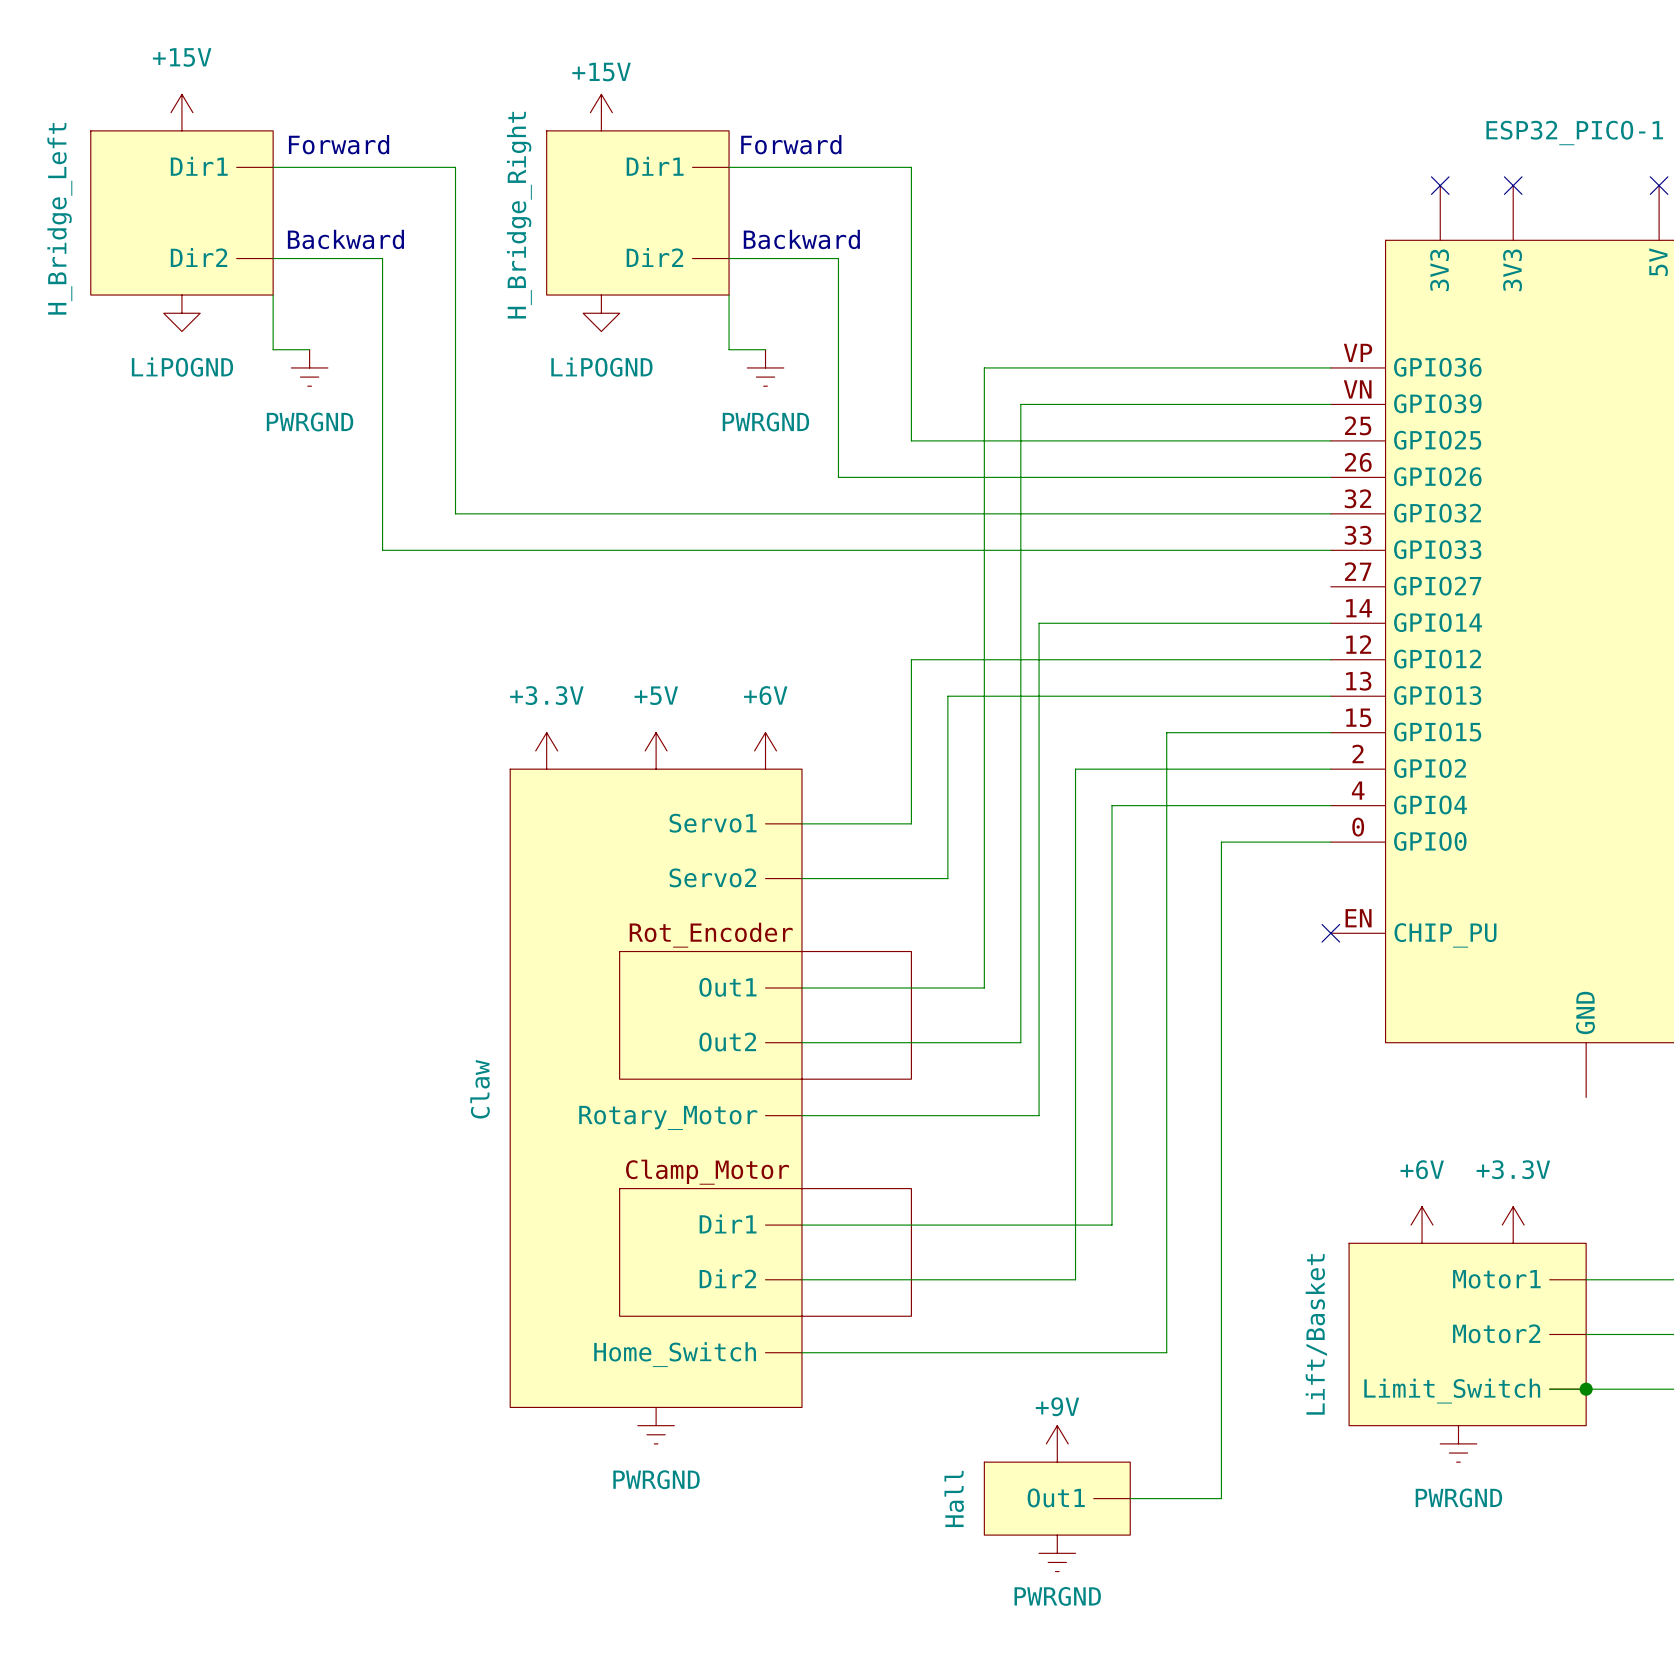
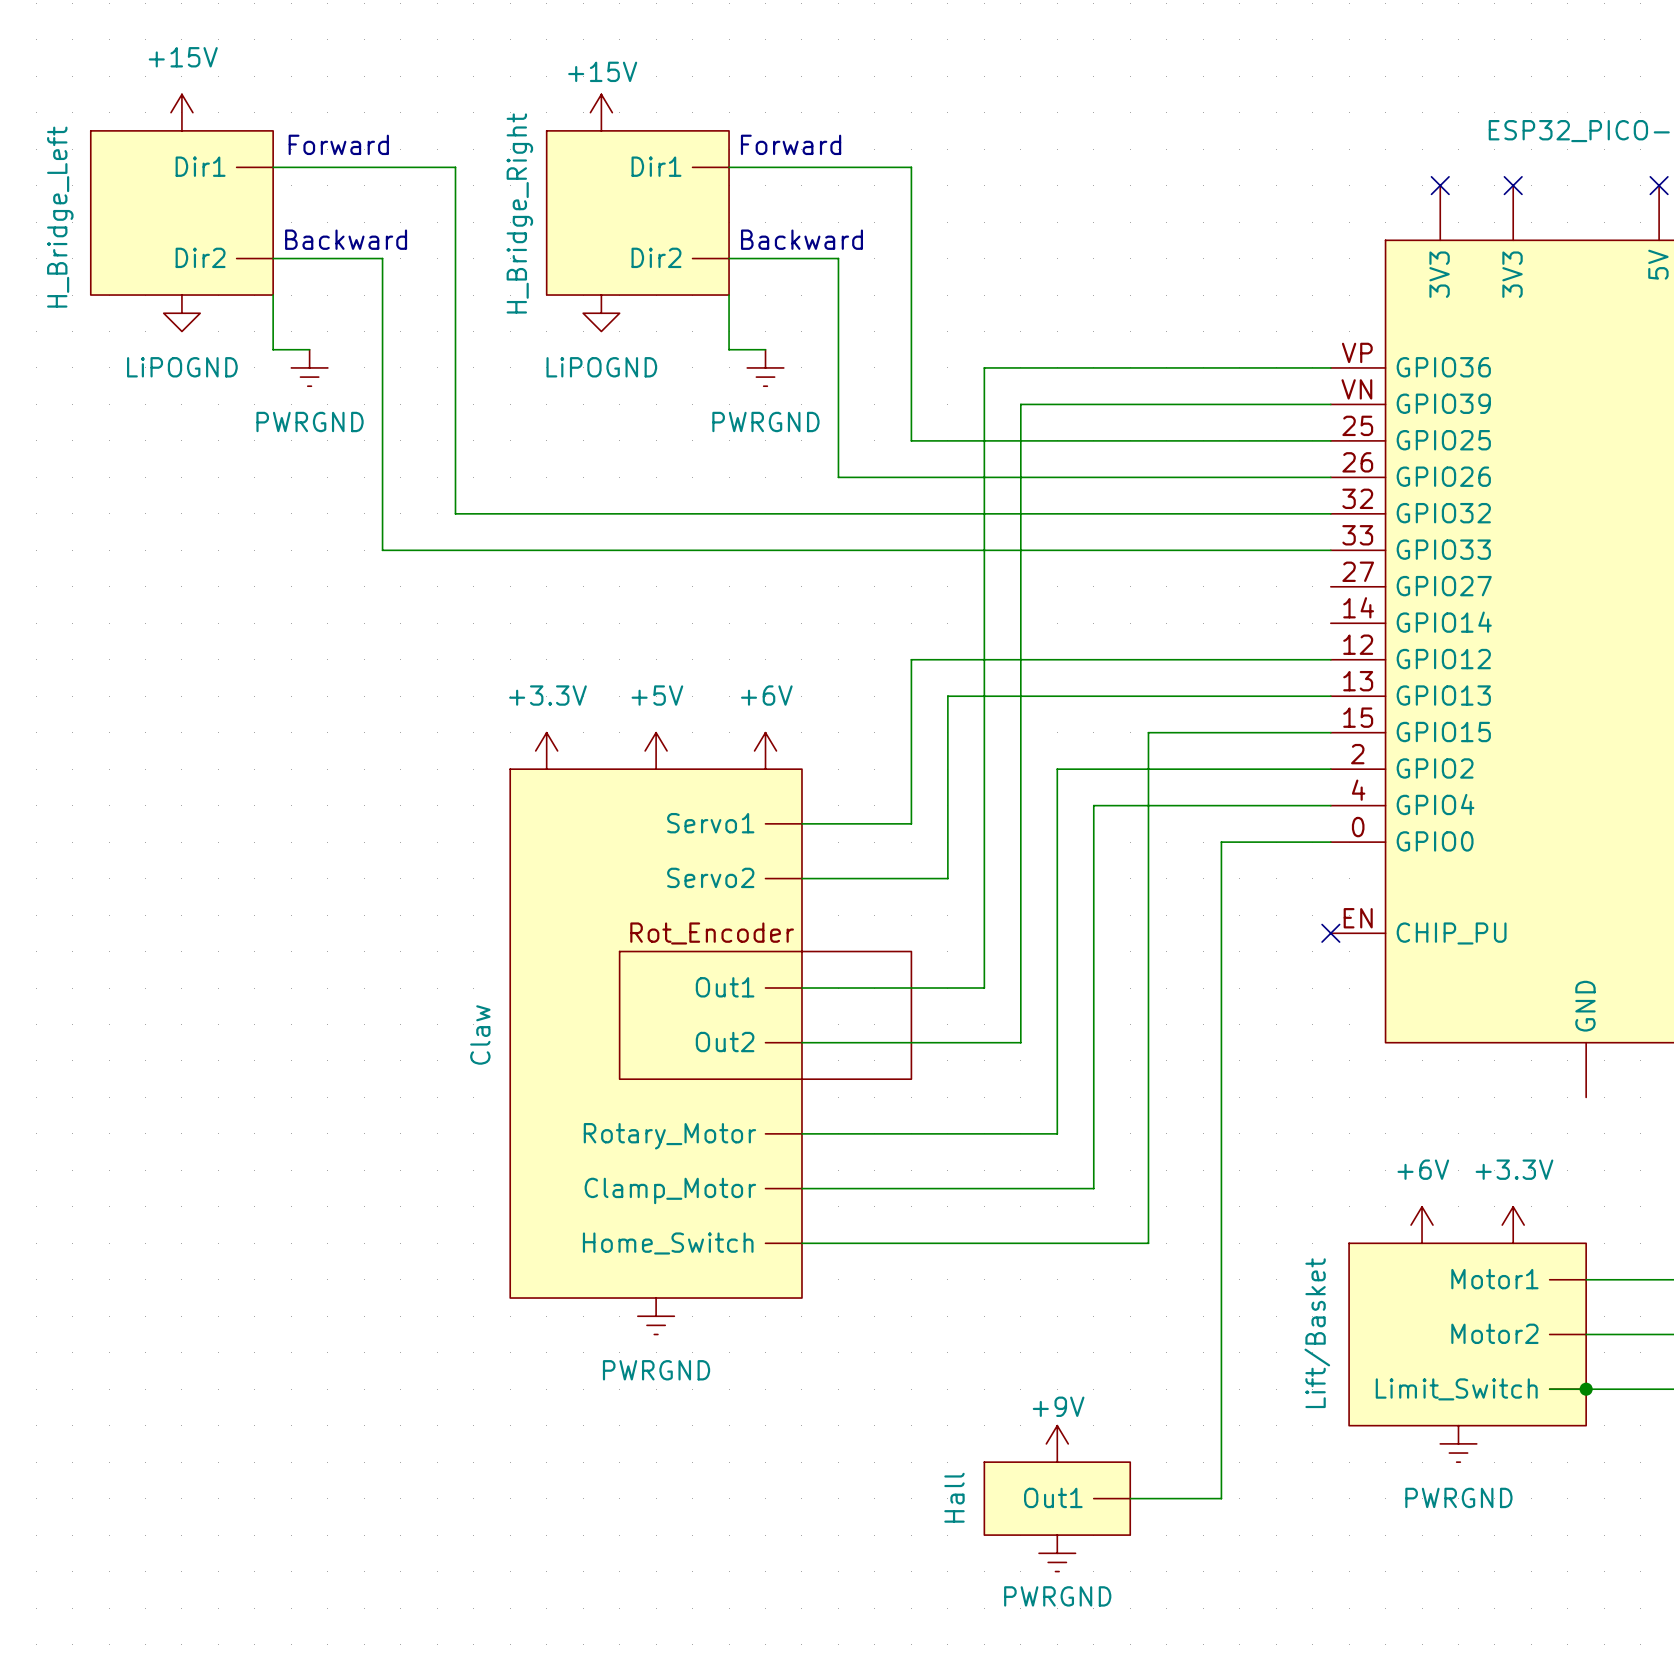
wire: (1330, 623) (1039, 623) (1039, 1115) (801, 1115) -> none
wire: (1166, 732) (1166, 1352) (801, 1352) -> (1166, 732) (1148, 732) (1148, 1243) (801, 1243)
wire: (1075, 769) (1075, 1279) (801, 1279) -> (1075, 769) (1057, 769) (1057, 1133) (801, 1133)
wire: (1112, 805) (1112, 1225) (801, 1225) -> (1112, 805) (1093, 805) (1093, 1188) (801, 1188)
Claw: none -> (710, 1033)
Claw: (710, 1088) -> none
power symbol position: PWRGND (656, 1425) -> PWRGND (656, 1316)

